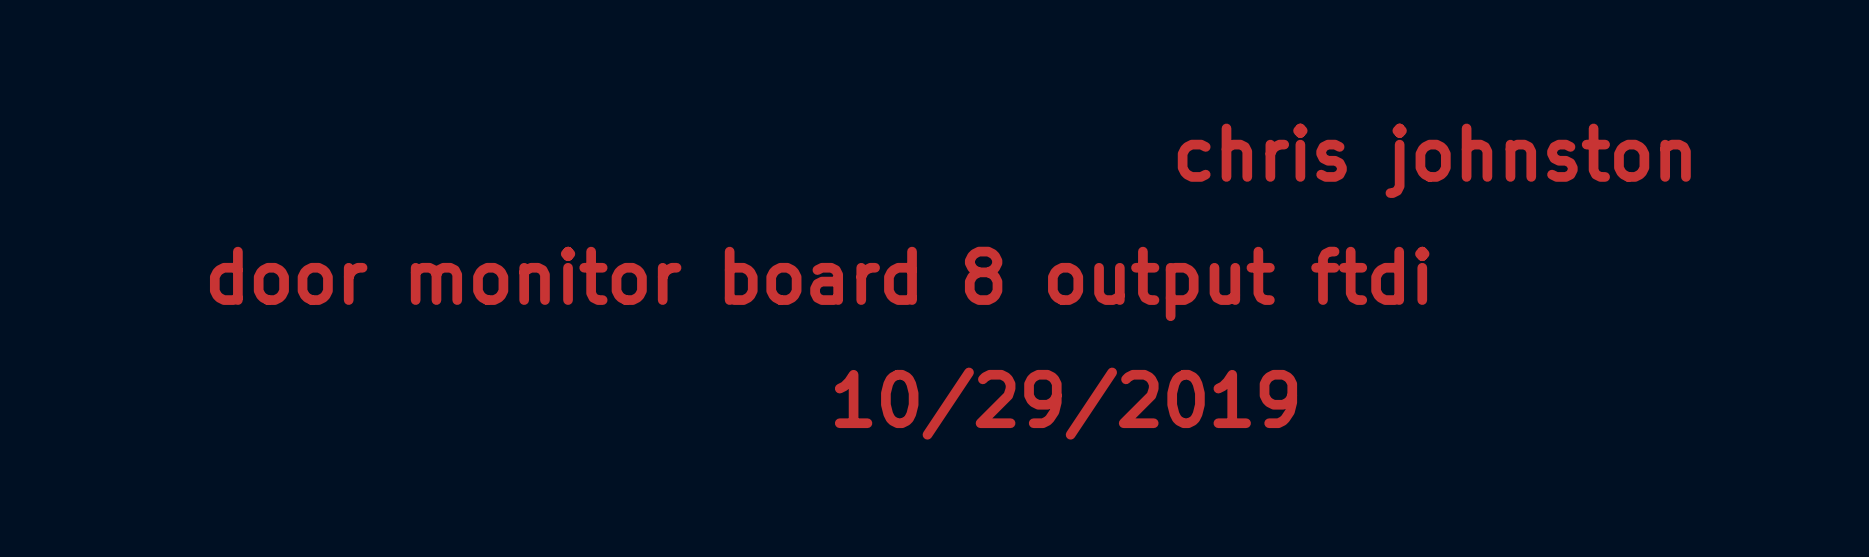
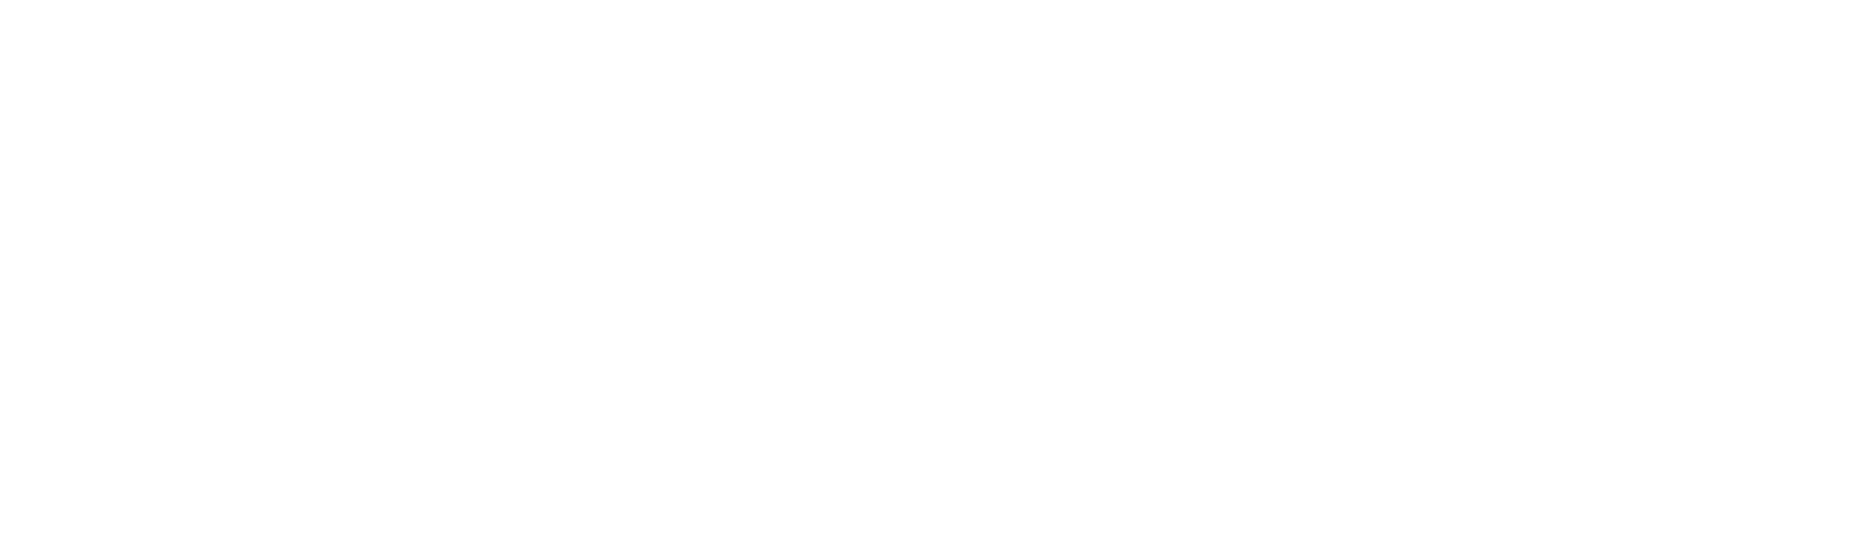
text: chris johnston (1434, 160) -> none
text: door monitor board 8 output ftdi (819, 283) -> none
text: 10/29/2019 (1065, 403) -> none

